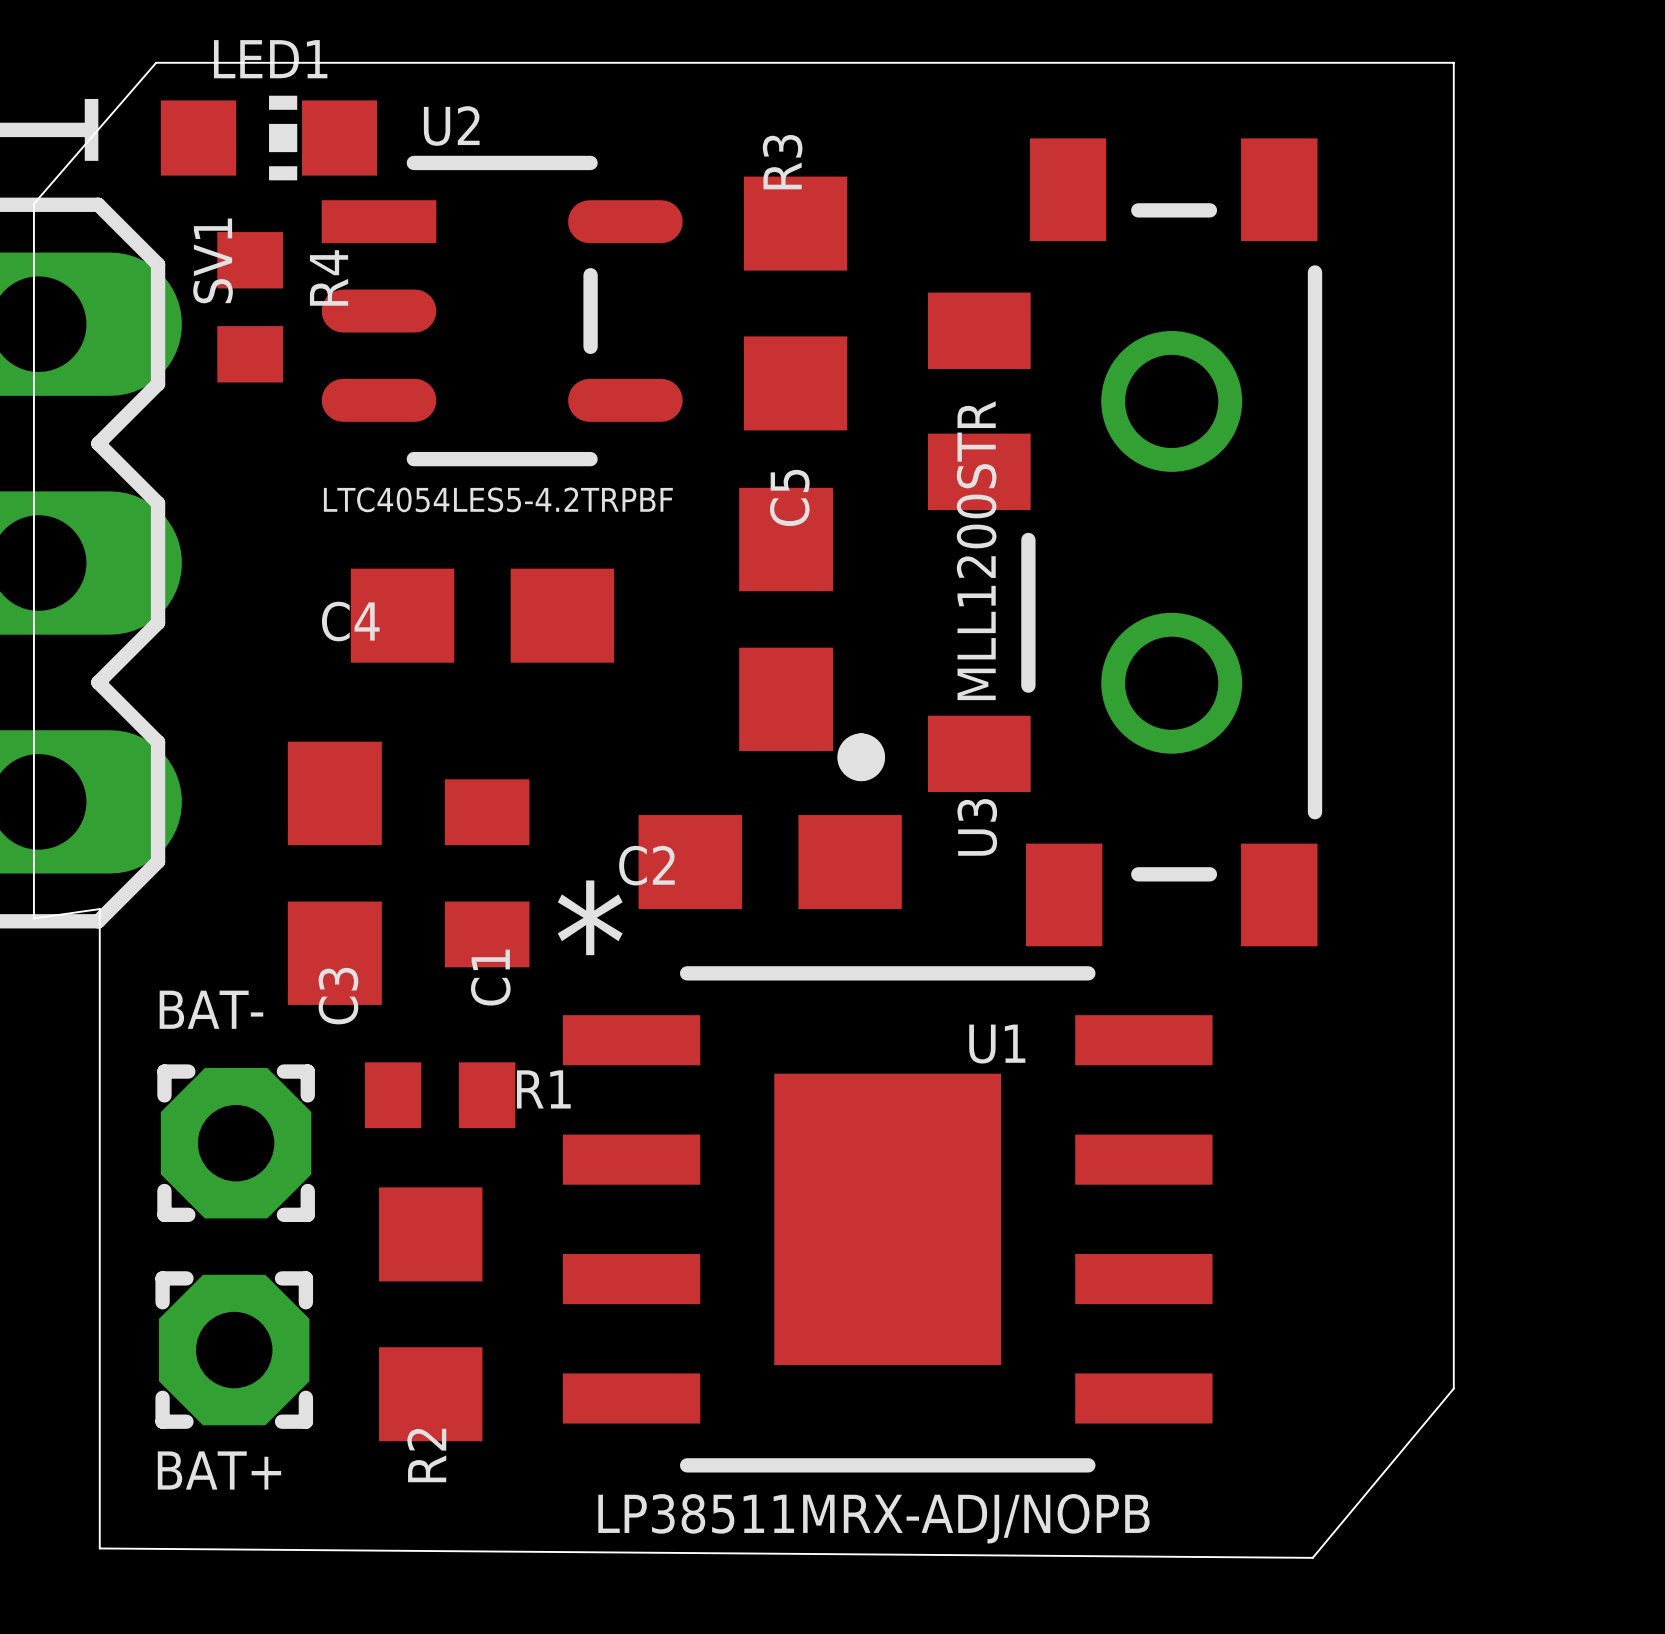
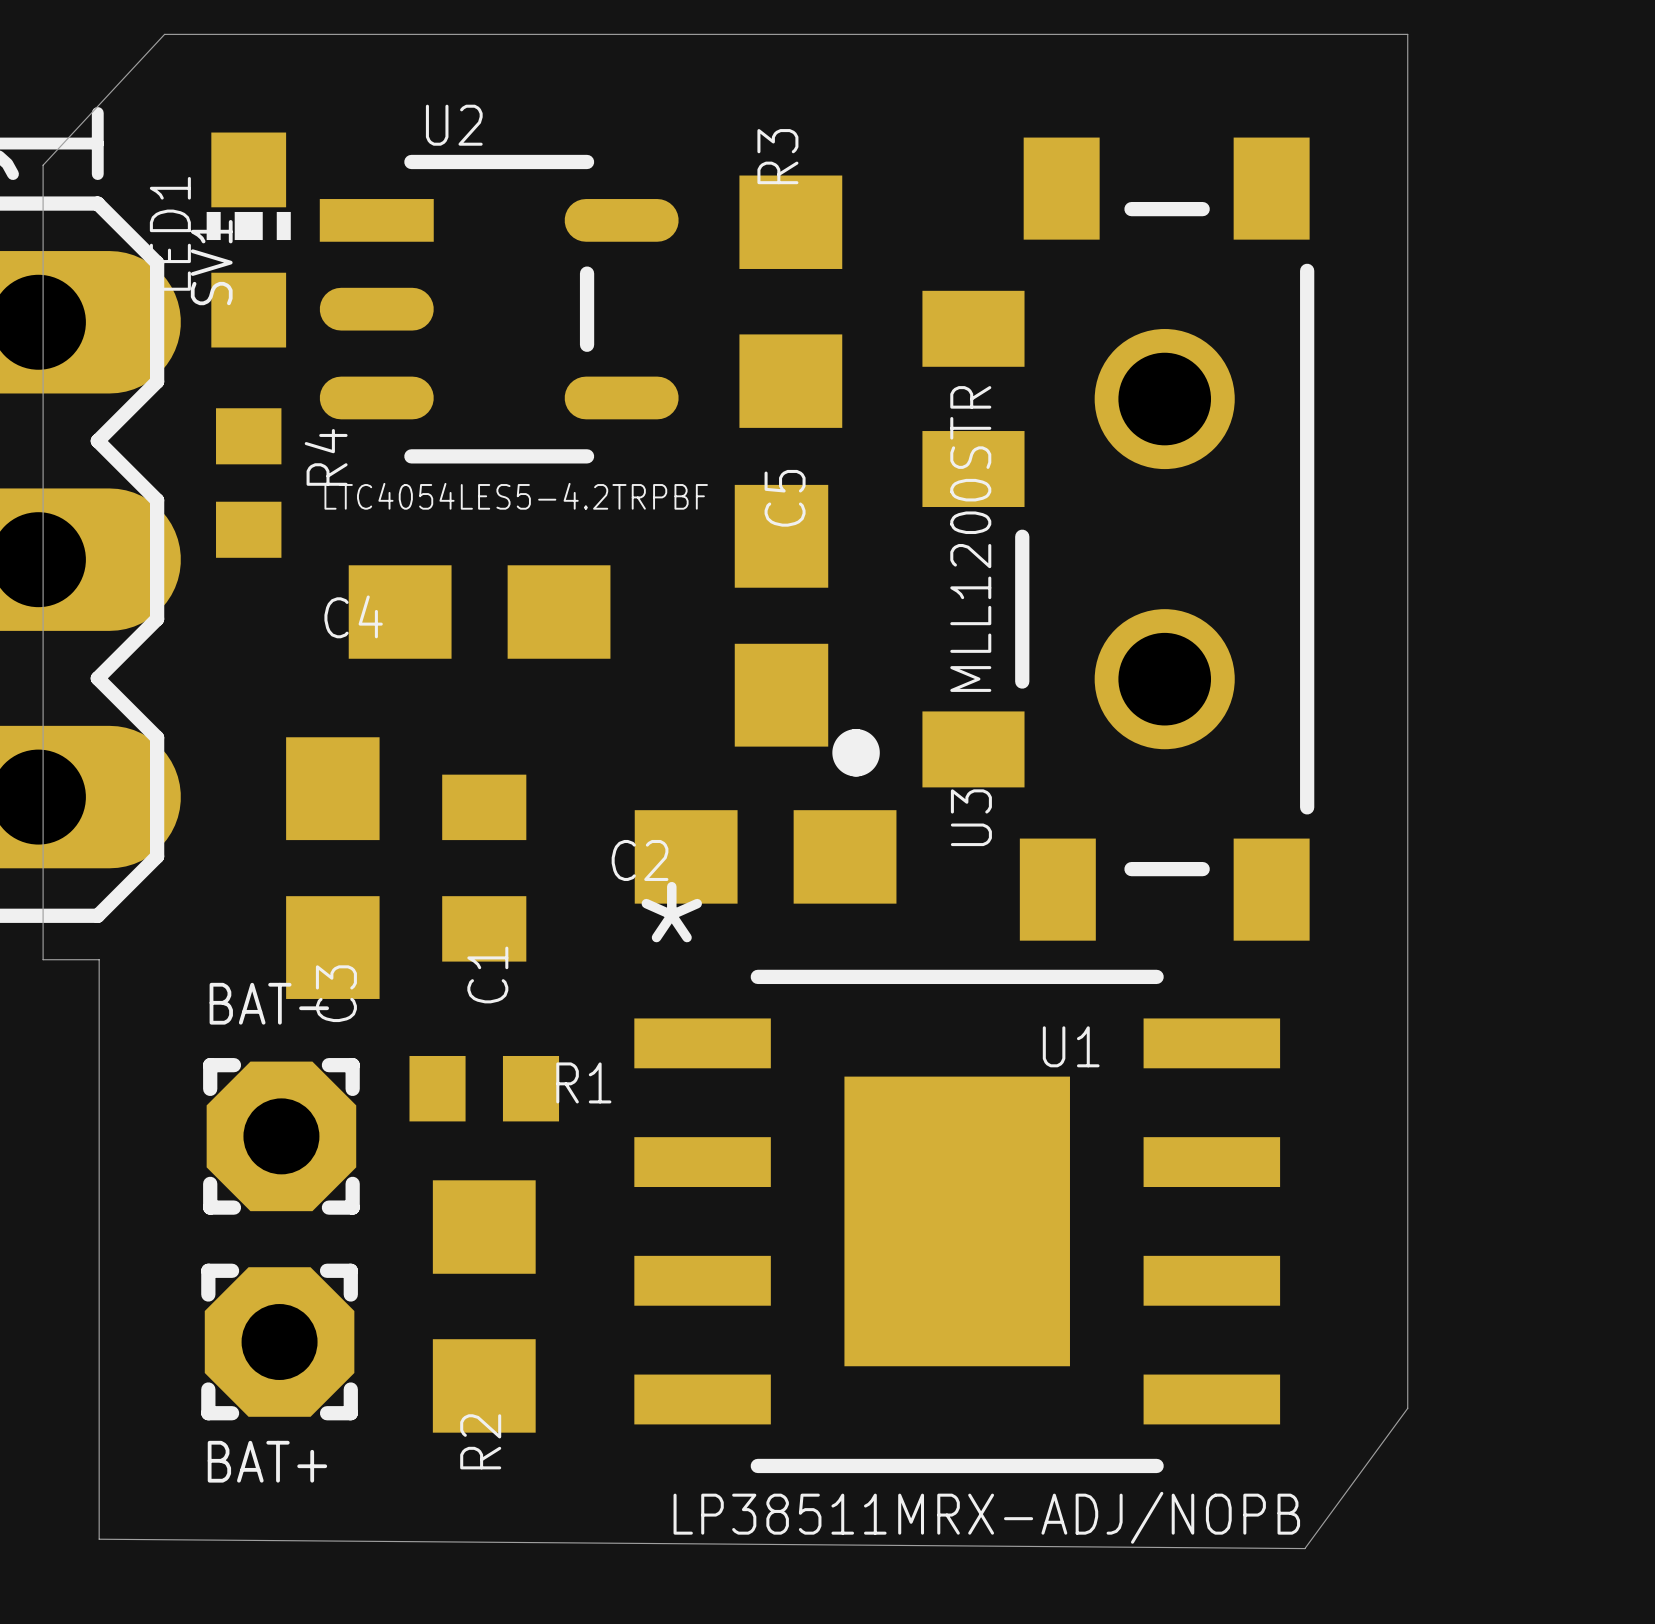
LED1 rotation: 0° (269, 138) -> 90° counterclockwise (248, 240)
R4 position: (250, 307) -> (248, 483)
board edge: (99, 965) (99, 909) (33, 918) (33, 203) (156, 62) (1453, 62) (1453, 1388) (1312, 1557) -> (99, 959) (43, 959) (43, 165) (164, 34) (1407, 34) (1407, 1408) (1304, 1548)
R1 position: (440, 1095) -> (484, 1088)
BAT- position: (236, 1143) -> (281, 1136)
U1 position: (887, 1219) -> (957, 1221)
R2 position: (430, 1314) -> (484, 1306)
BAT+ position: (234, 1350) -> (279, 1342)

